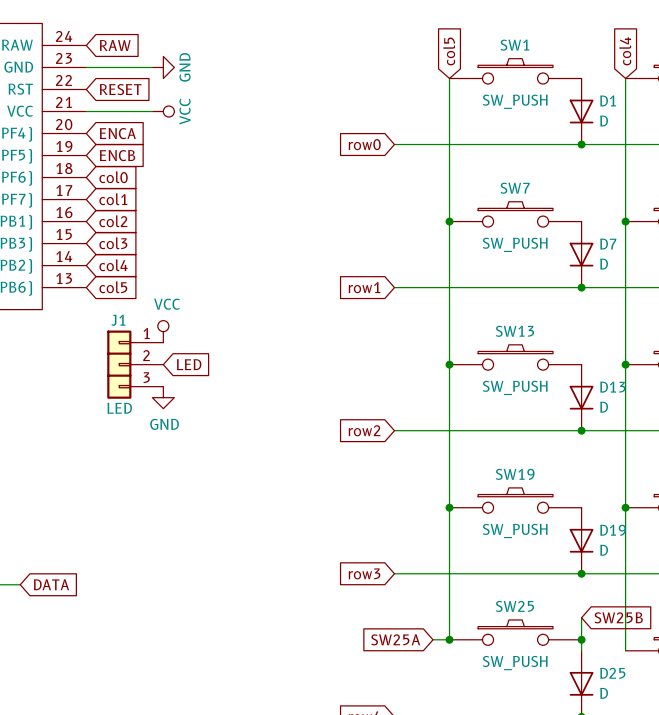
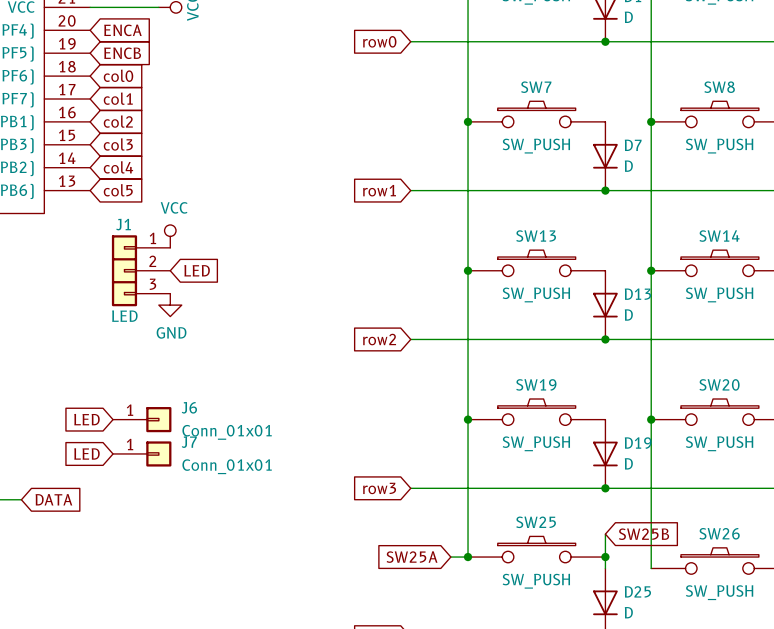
global label: none -> LED (86, 419)
J6: none -> Conn_01x01 (142, 419)
global label: none -> LED (86, 453)
J7: none -> Conn_01x01 (142, 453)

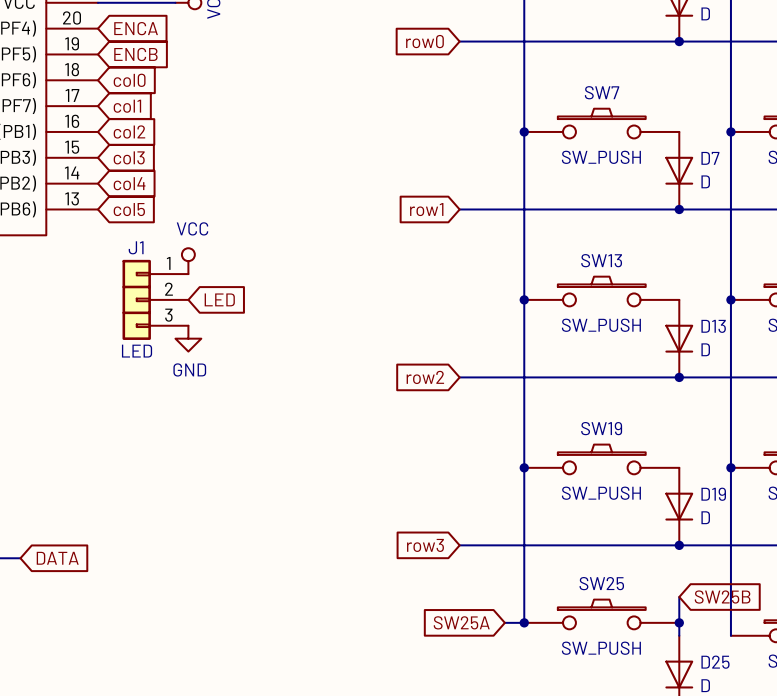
global label: LED (86, 419) -> none
J6: Conn_01x01 (142, 419) -> none
global label: LED (86, 453) -> none
J7: Conn_01x01 (142, 453) -> none

